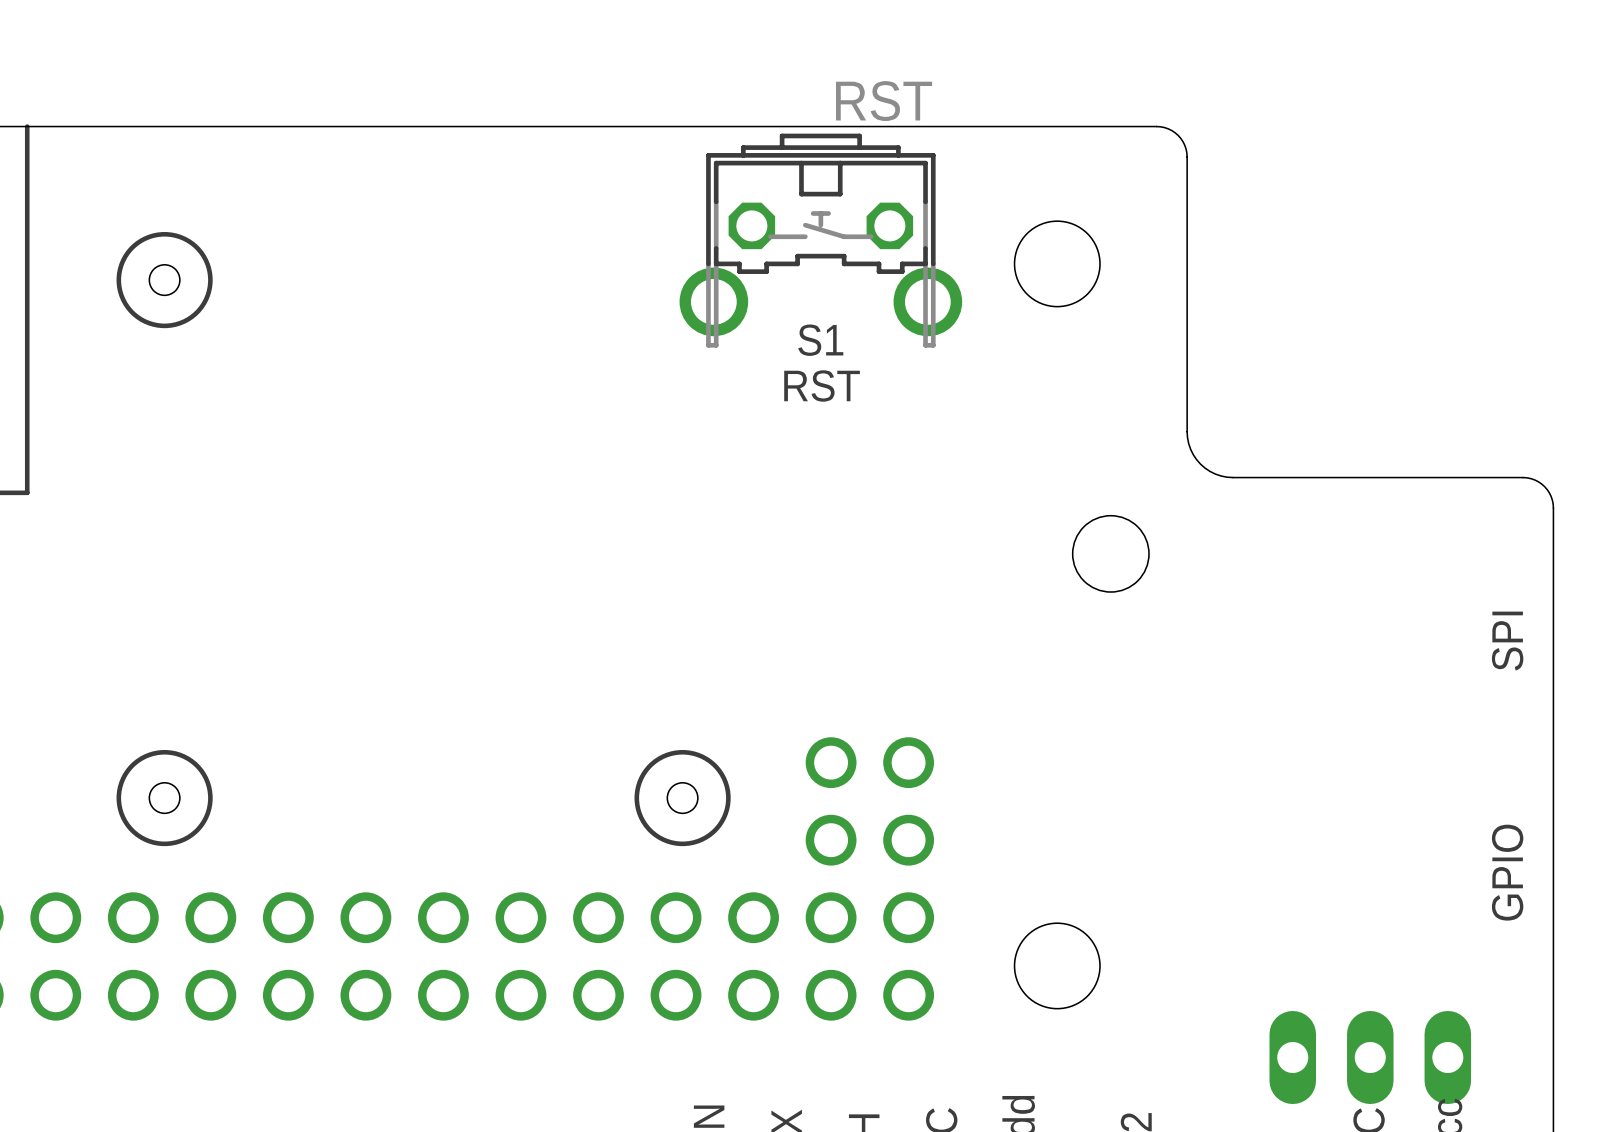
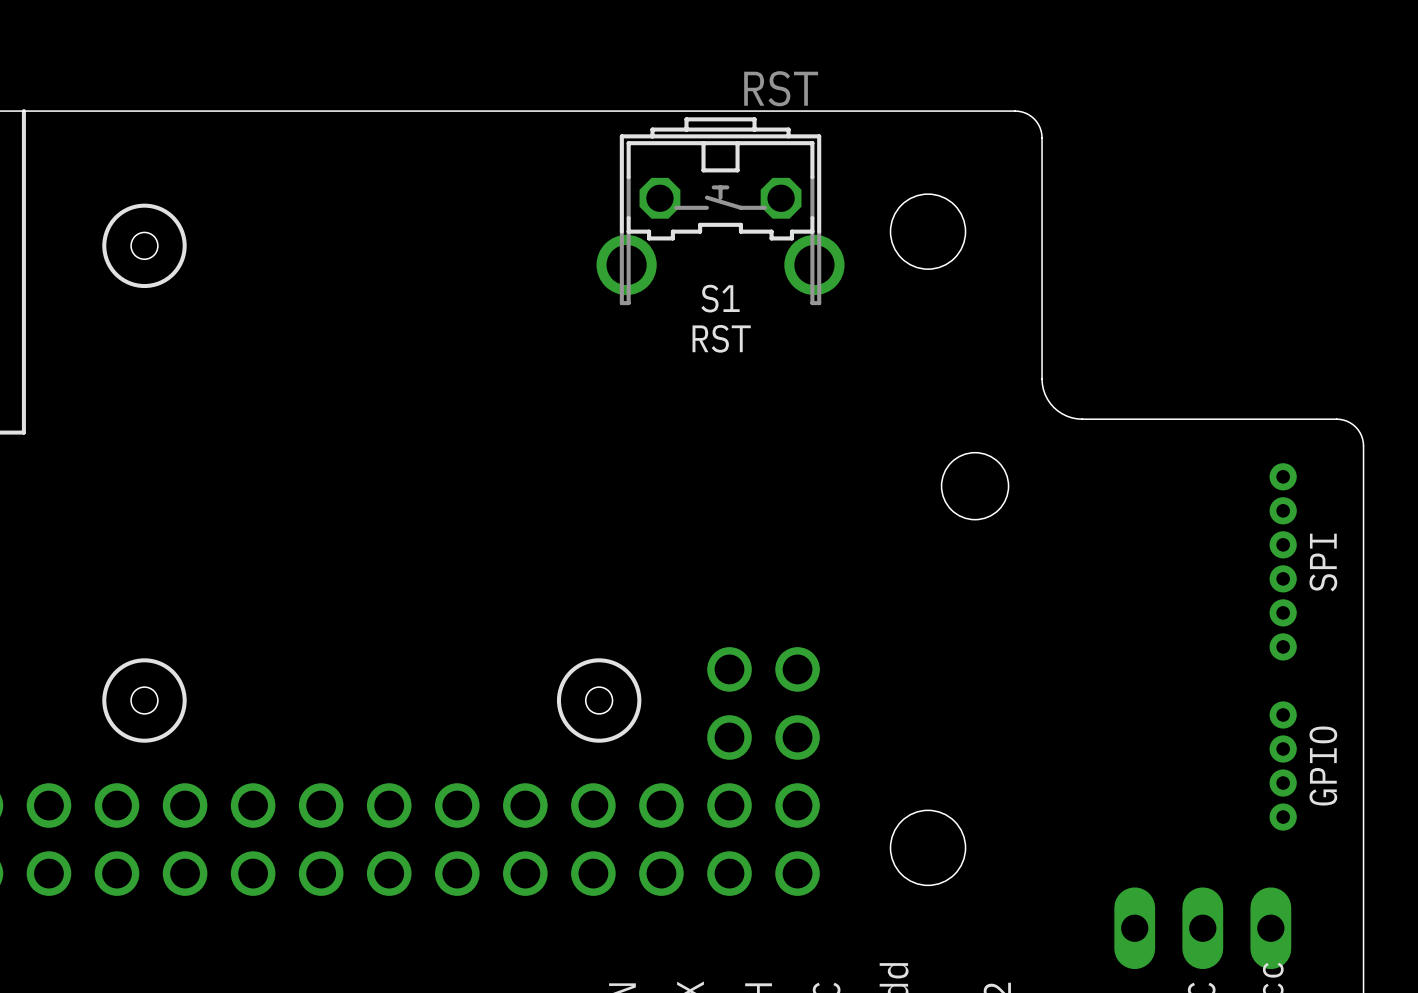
part: none -> (1283, 561)
part: none -> (1283, 766)

